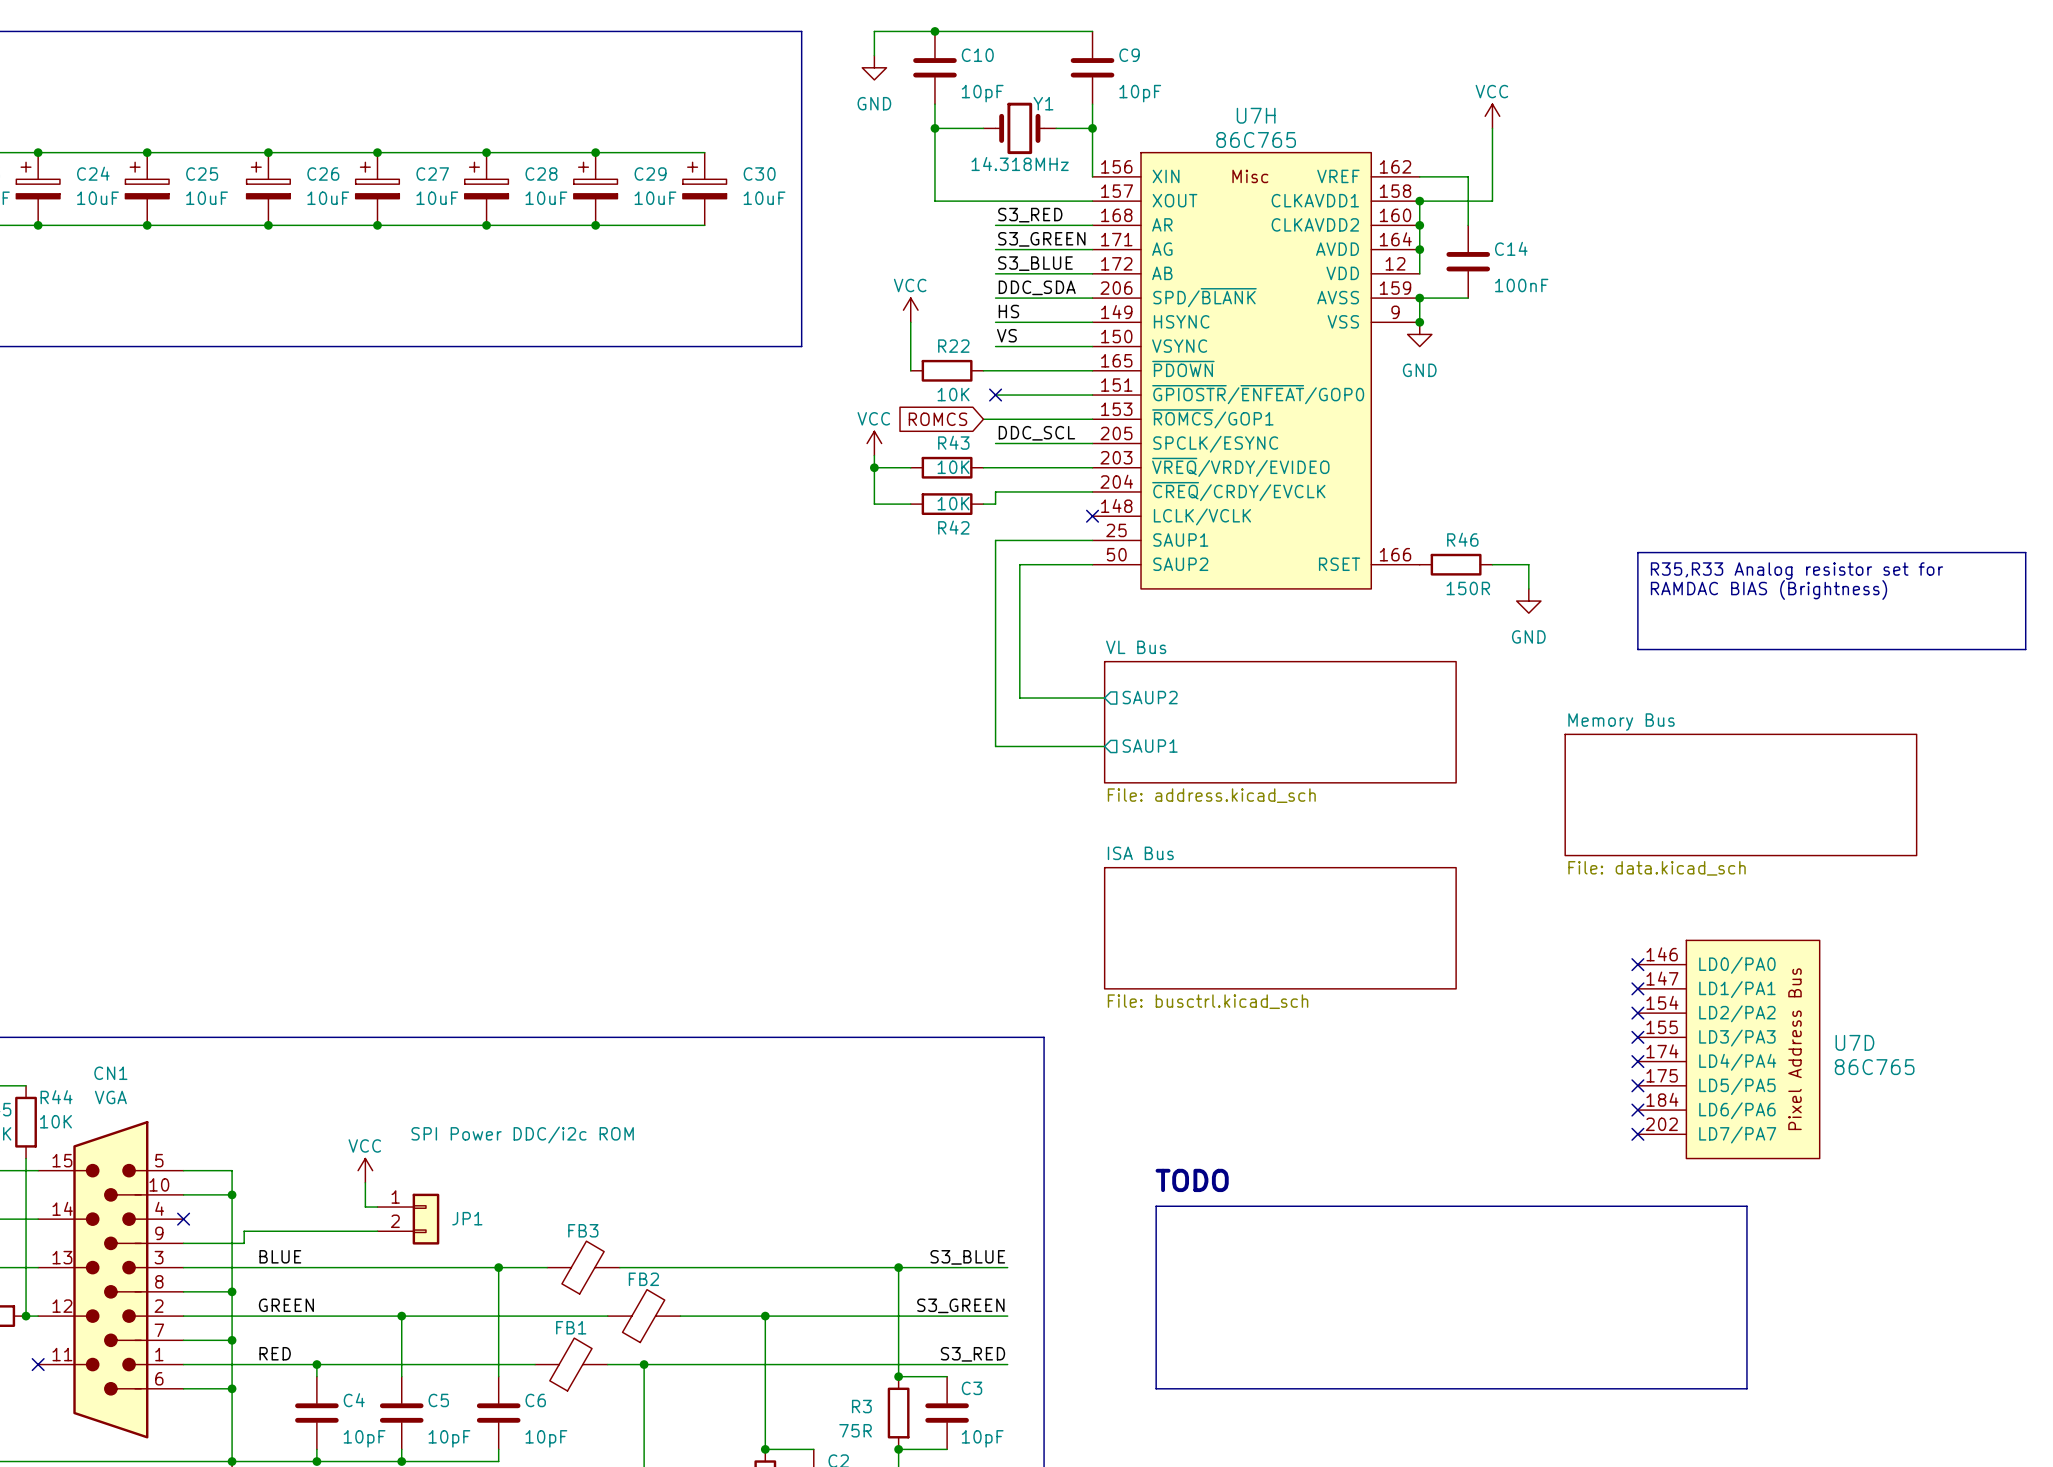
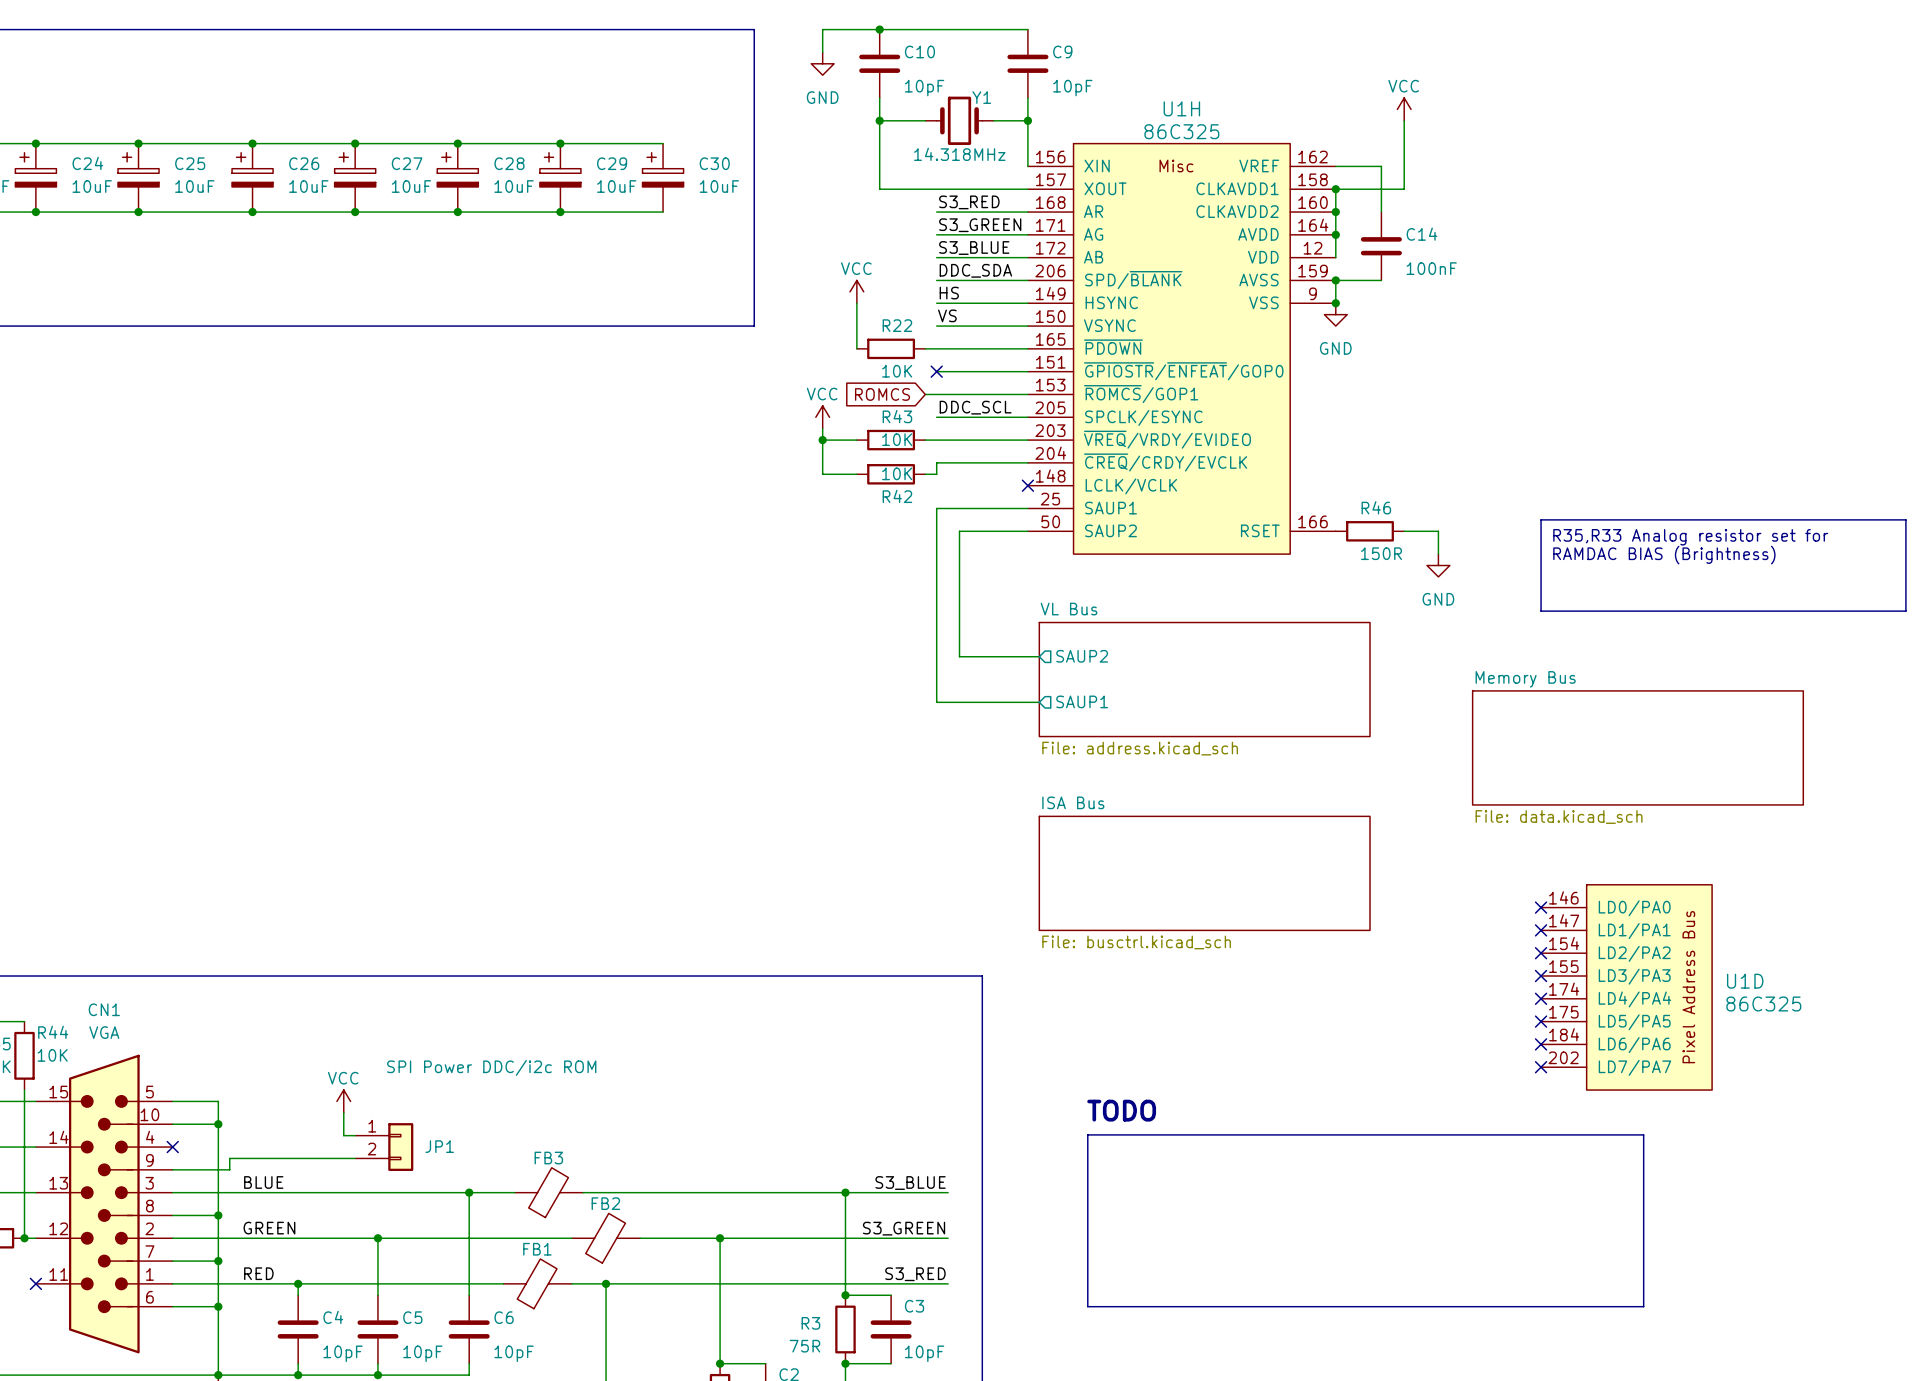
U7H name: U7H (1256, 115) -> U1H (1181, 108)
U7H value: 86C765 (1256, 139) -> 86C325 (1181, 131)
U7D name: U7D (1854, 1042) -> U1D (1745, 981)
U7D value: 86C765 (1874, 1067) -> 86C325 (1763, 1004)

